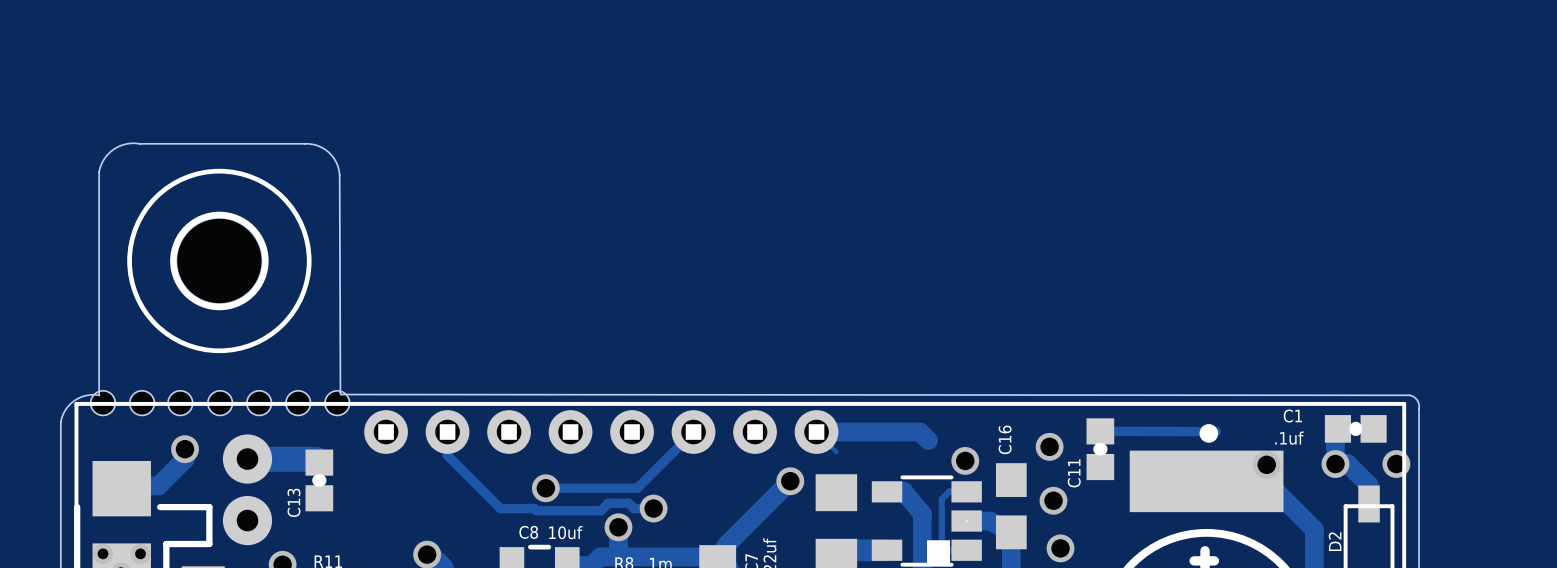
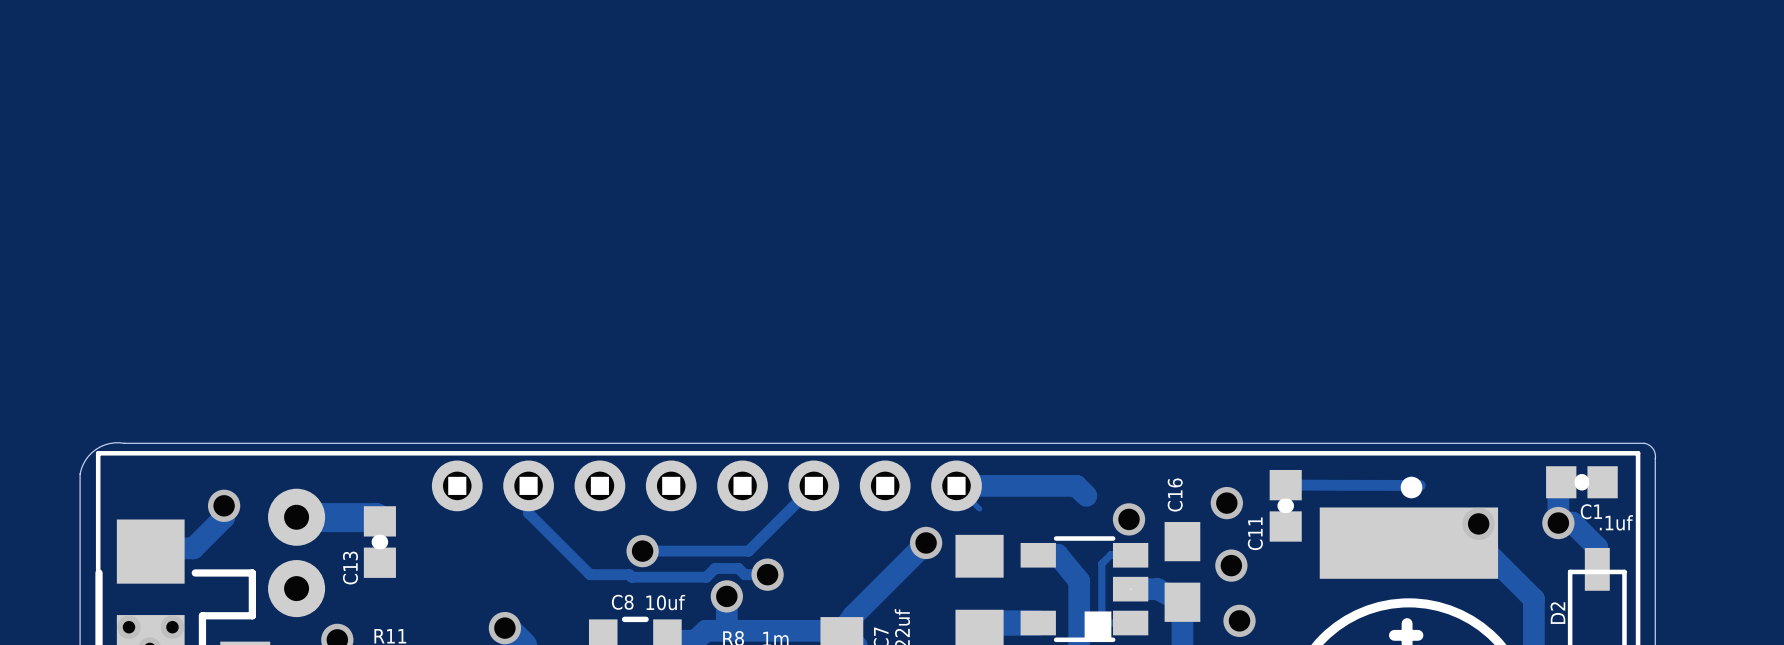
part: (219, 260) -> none
board edge: (99, 395) (99, 171) (104, 159) (110, 152) (121, 145) (135, 143) (308, 143) (321, 147) (331, 155) (338, 166) (339, 175) (341, 394) (1409, 395) -> (124, 443) (1644, 443)
hole: (103, 403) -> none
hole: (142, 403) -> none
hole: (180, 403) -> none
hole: (220, 403) -> none
hole: (259, 403) -> none
hole: (298, 403) -> none
hole: (337, 403) -> none
C1 name position: C1 (1292, 416) -> C1 (1591, 511)
C1 value position: .1uf (1289, 438) -> .1uf (1616, 522)
via: (1396, 464) -> none

